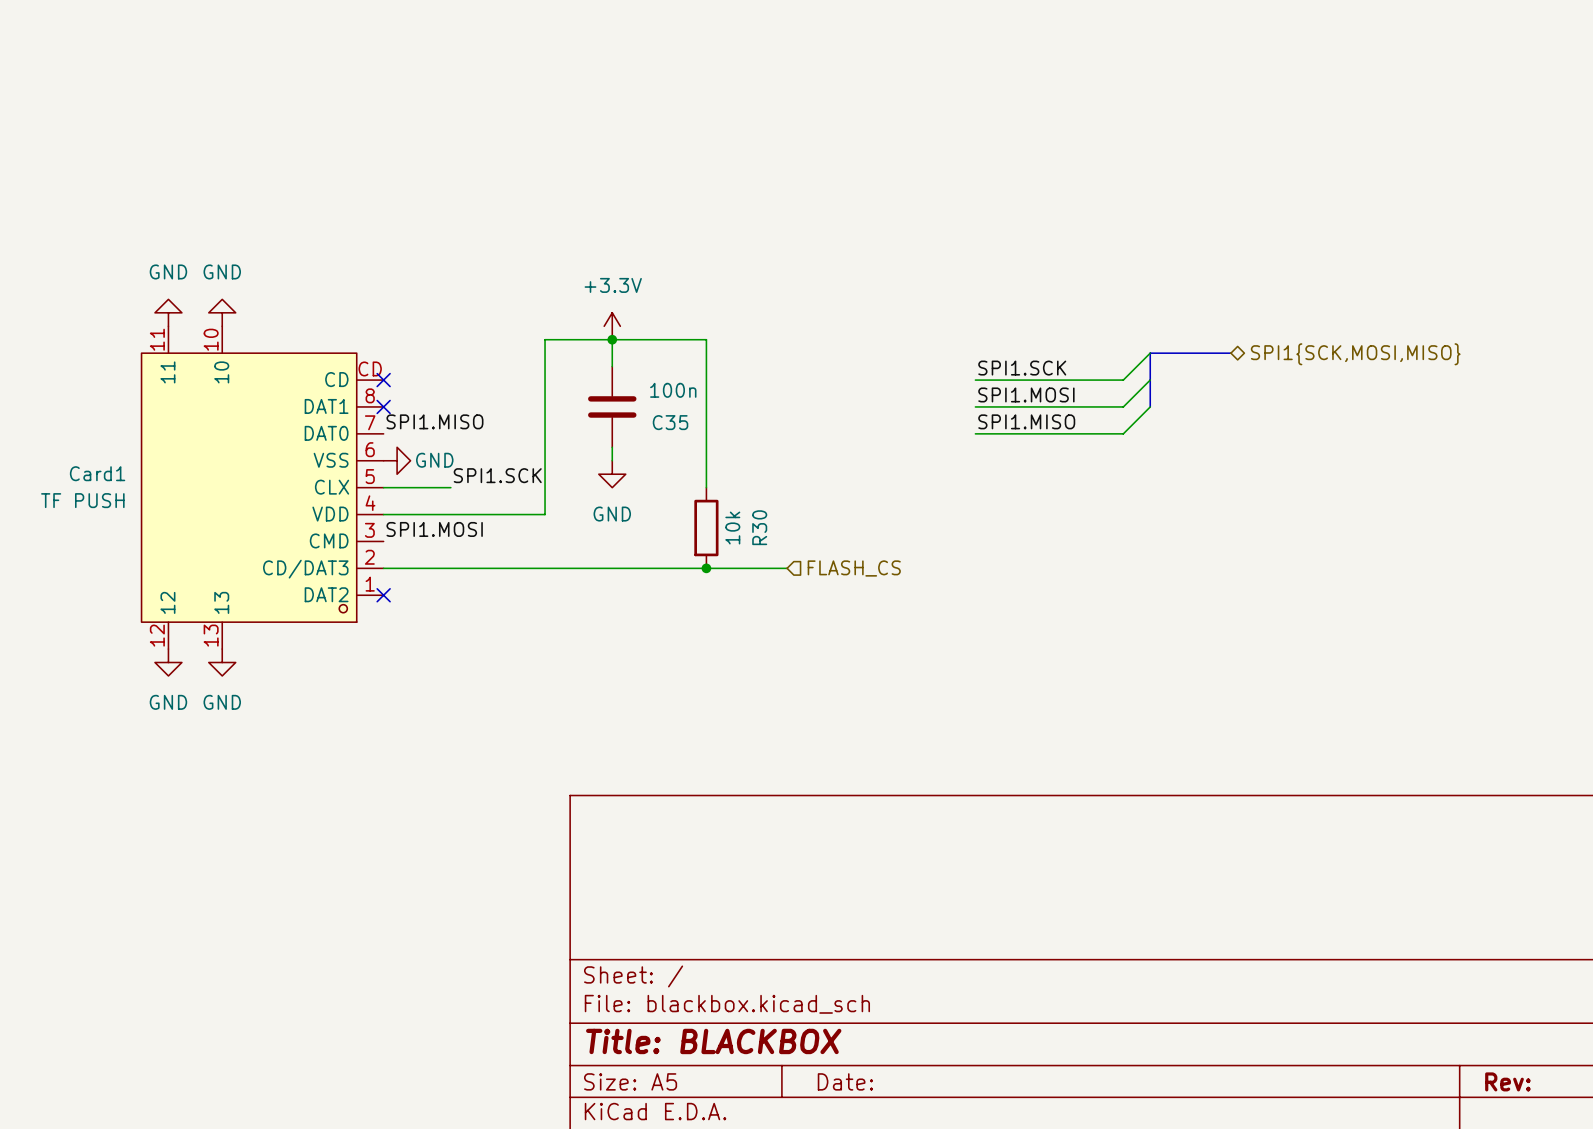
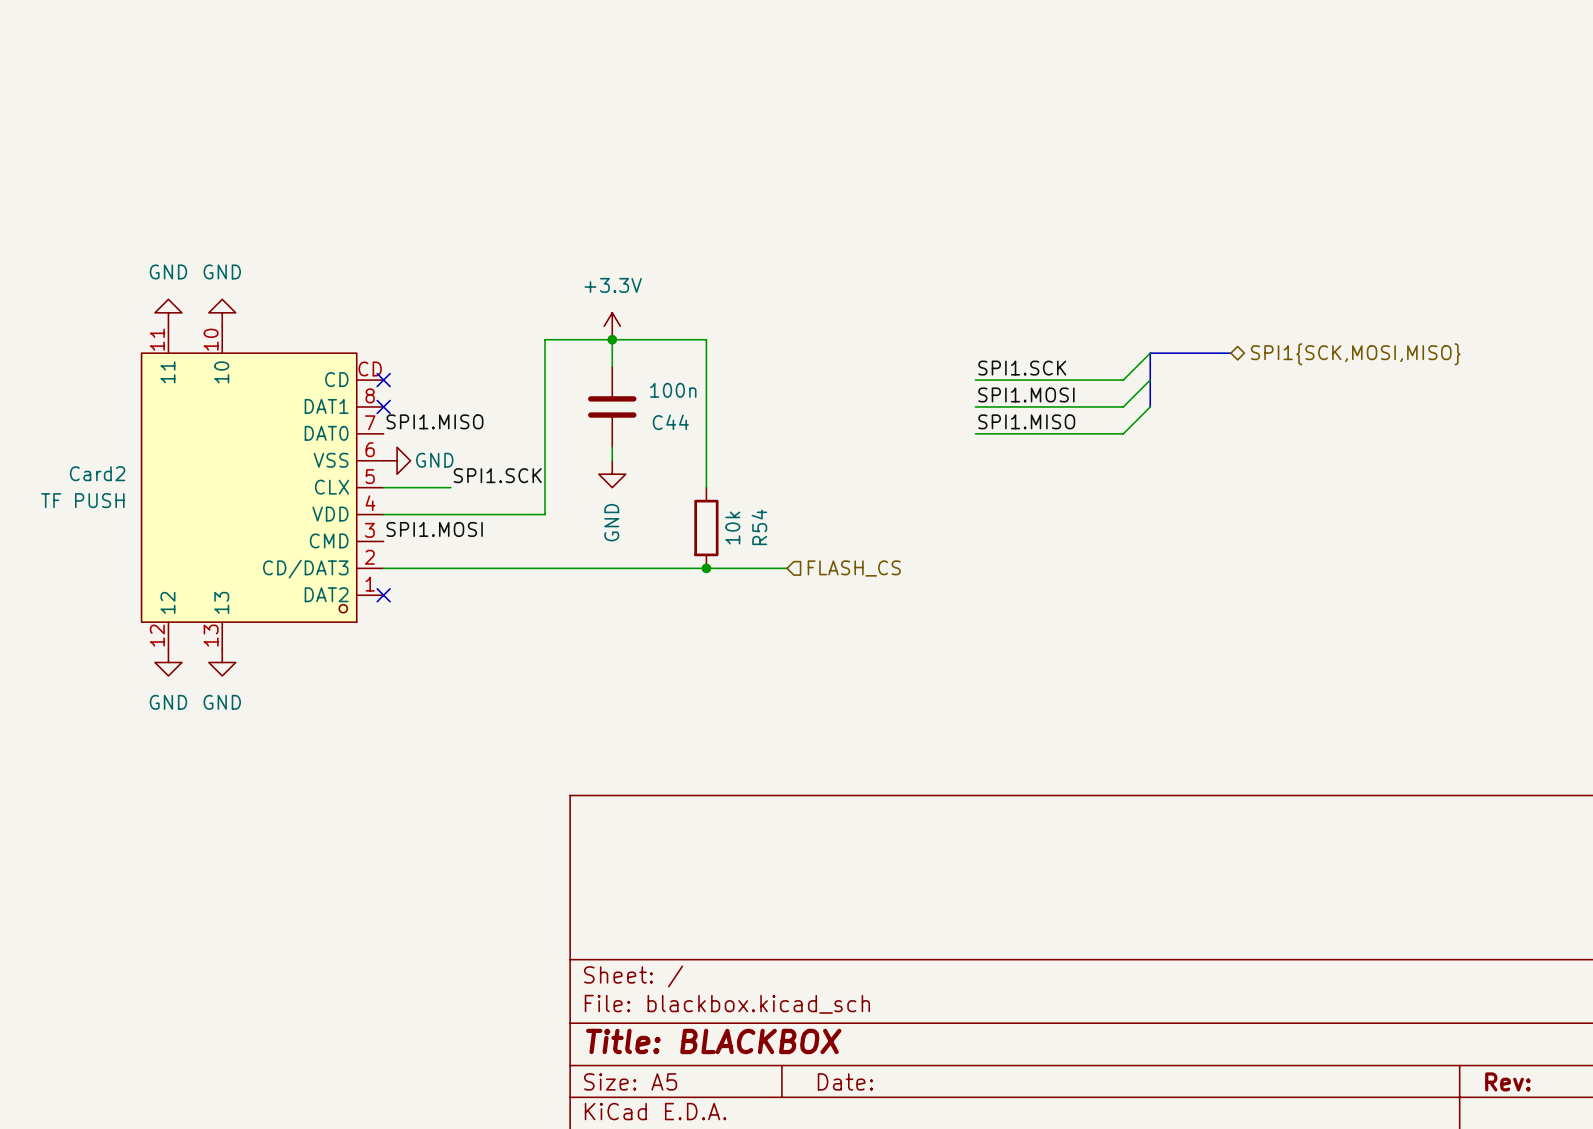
C35 name: C35 (670, 422) -> C44 (670, 422)
Card1 name: Card1 (97, 473) -> Card2 (97, 473)
power symbol text rotation: 0° (612, 514) -> 90° counterclockwise (611, 522)
R30 name: R30 (759, 527) -> R54 (759, 527)

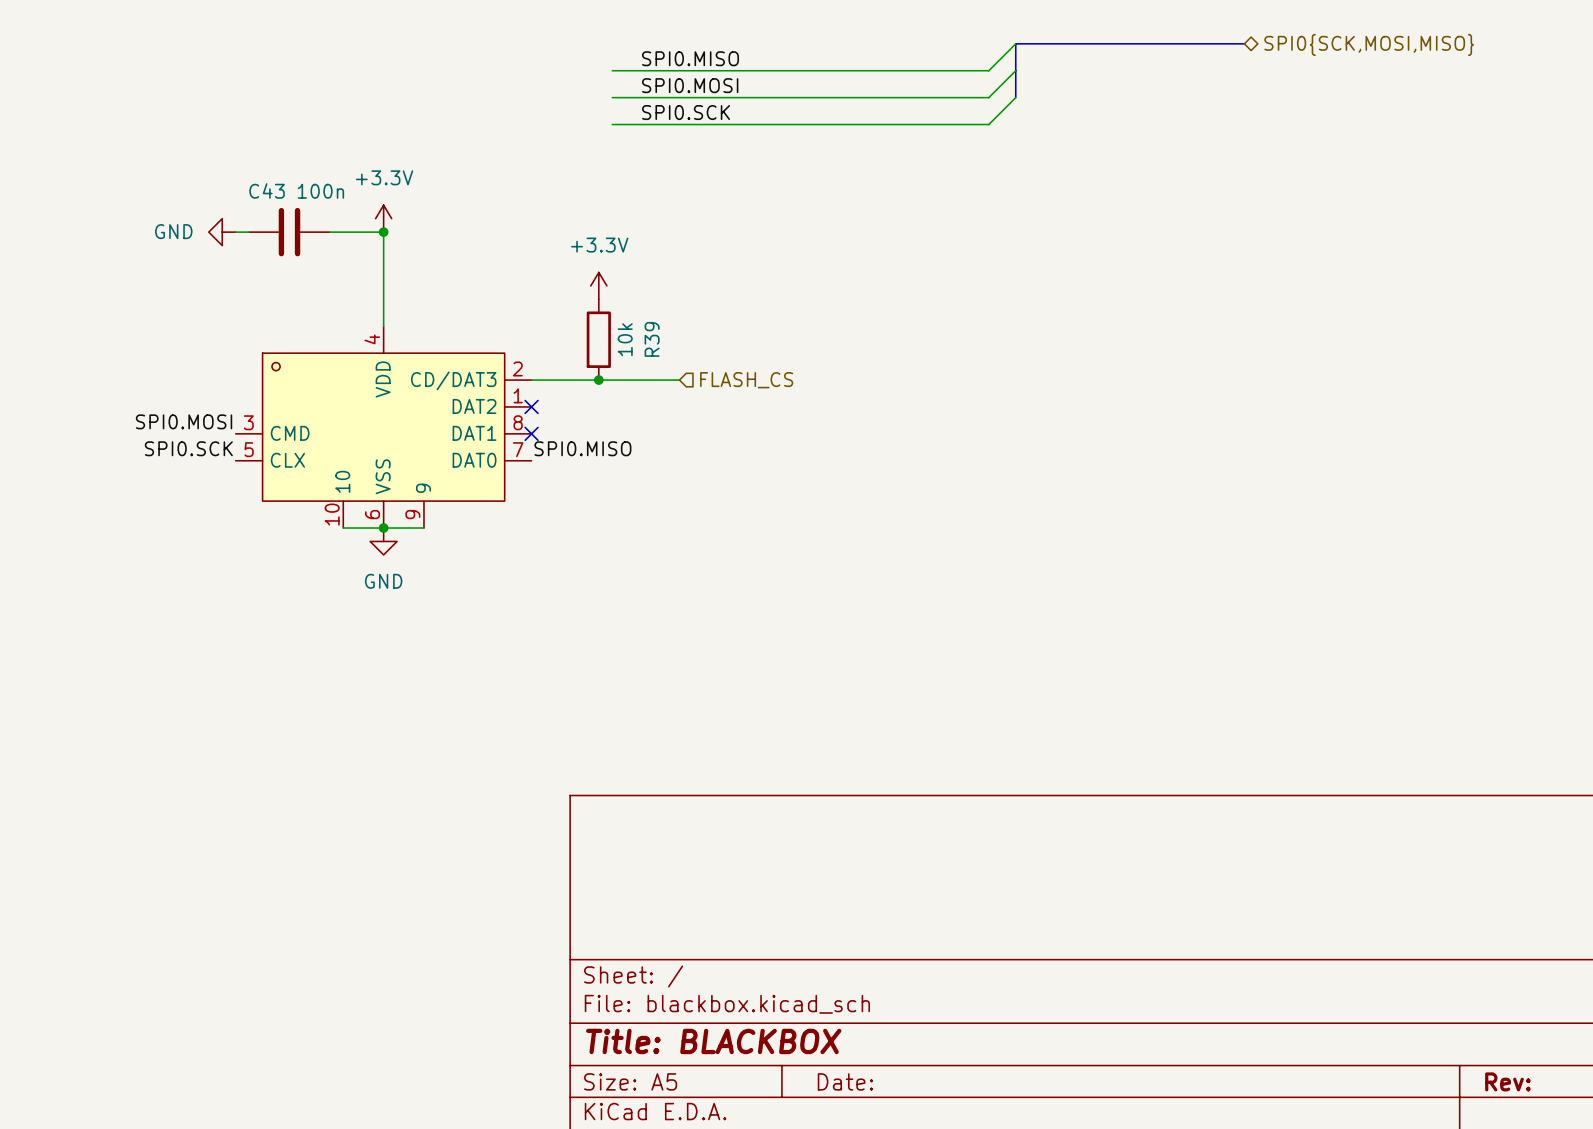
wire: none -> (1015, 43) (988, 70) (612, 70)
bus: none -> (1244, 43) (1015, 43) (1015, 97)
hierarchical label: none -> SPI0{SCK,MOSI,MISO} (1369, 44)
label: none -> SPI0.MISO (690, 58)
wire: none -> (1015, 70) (988, 97) (612, 97)
label: none -> SPI0.MOSI (690, 85)
wire: none -> (1015, 97) (988, 124) (612, 124)
label: none -> SPI0.SCK (686, 112)
power symbol: none -> +3.3V (383, 218)
power symbol: none -> GND (222, 232)
wire: none -> (235, 232) (249, 232)
C43: none -> 100n (289, 232)
wire: none -> (329, 232) (383, 232) (383, 326)
junction: none -> (383, 232)
power symbol: GND (168, 312) -> none
power symbol: GND (222, 312) -> none
power symbol position: +3.3V (612, 326) -> +3.3V (598, 285)
R39: none -> 10k (598, 339)
wire: (612, 339) (612, 366) -> none
junction position: (612, 339) -> (598, 380)
wire: (1150, 353) (1123, 380) (975, 380) -> none
bus: (1230, 353) (1150, 353) (1150, 406) -> none
hierarchical label: SPI1{SCK,MOSI,MISO} (1355, 354) -> none
label: SPI1.SCK (1022, 368) -> none
no-connect mark: (383, 380) -> none
wire: none -> (531, 380) (679, 380)
wire: (1150, 380) (1123, 406) (975, 406) -> none
label: SPI1.MOSI (1026, 394) -> none
no-connect mark: (383, 406) -> none
no-connect mark: none -> (531, 406)
C44: 100n (612, 406) -> none
wire: (1150, 406) (1123, 433) (975, 433) -> none
label: none -> SPI0.MOSI (184, 421)
label: SPI1.MISO (434, 421) -> none
label: SPI1.MISO (1026, 421) -> none
part: none -> (383, 427)
no-connect mark: none -> (531, 433)
wire: (612, 447) (612, 460) -> none
label: none -> SPI0.SCK (188, 448)
label: none -> SPI0.MISO (582, 448)
power symbol rotation: 0° (397, 460) -> 90° clockwise (383, 541)
power symbol position: GND (397, 460) -> GND (383, 541)
power symbol: GND (612, 474) -> none
label: SPI1.SCK (497, 475) -> none
Card2: TF PUSH (262, 487) -> none
wire: (706, 487) (706, 339) (545, 339) (545, 514) (383, 514) -> none
wire: none -> (343, 528) (423, 528)
junction: none -> (383, 528)
R54: 10k (706, 528) -> none
label: SPI1.MOSI (434, 529) -> none
wire: (383, 568) (787, 568) -> none
junction: (706, 568) -> none
hierarchical label position: FLASH_CS (854, 568) -> FLASH_CS (746, 380)
no-connect mark: (383, 595) -> none
power symbol: GND (168, 662) -> none
power symbol: GND (222, 662) -> none

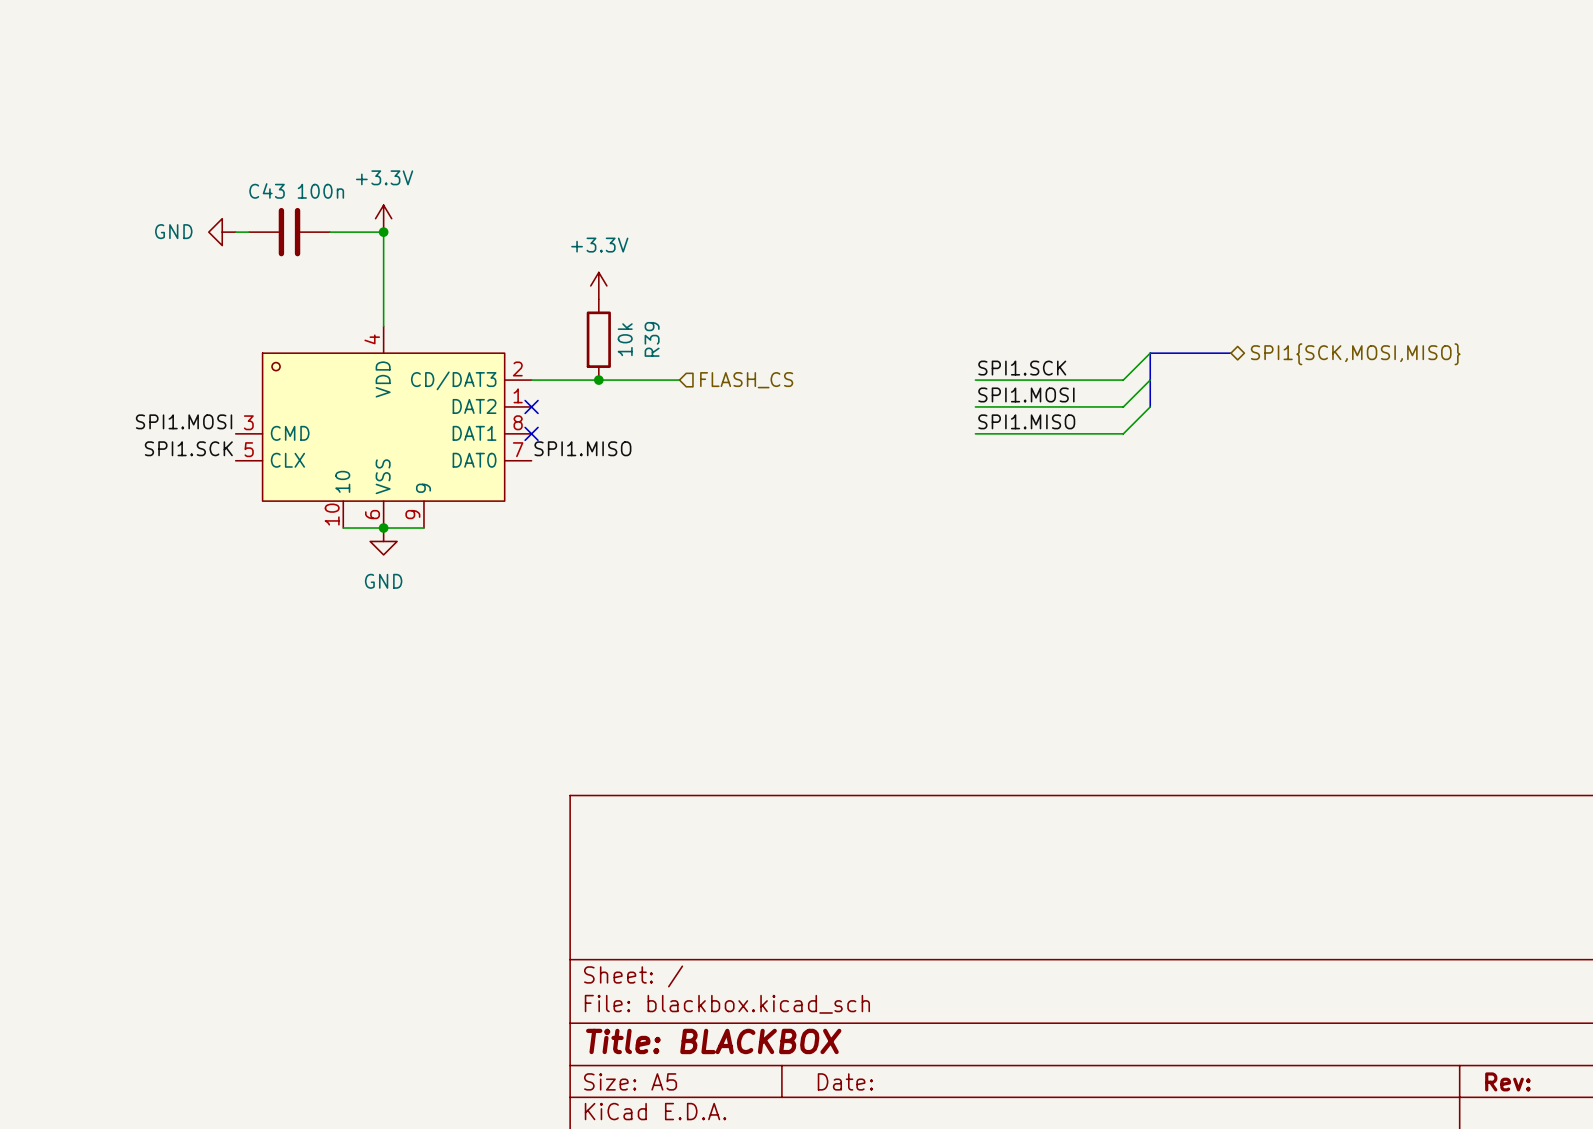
wire: (1015, 43) (988, 70) (612, 70) -> none
bus: (1244, 43) (1015, 43) (1015, 97) -> none
hierarchical label: SPI0{SCK,MOSI,MISO} (1369, 44) -> none
label: SPI0.MISO (690, 58) -> none
wire: (1015, 70) (988, 97) (612, 97) -> none
label: SPI0.MOSI (690, 85) -> none
wire: (1015, 97) (988, 124) (612, 124) -> none
label: SPI0.SCK (686, 112) -> none
wire: none -> (1150, 353) (1123, 380) (975, 380)
bus: none -> (1230, 353) (1150, 353) (1150, 406)
hierarchical label: none -> SPI1{SCK,MOSI,MISO} (1355, 354)
label: none -> SPI1.SCK (1022, 368)
wire: none -> (1150, 380) (1123, 406) (975, 406)
label: none -> SPI1.MOSI (1026, 394)
wire: none -> (1150, 406) (1123, 433) (975, 433)
label: SPI0.MOSI (184, 421) -> SPI1.MOSI (184, 421)
label: none -> SPI1.MISO (1026, 421)
label: SPI0.SCK (188, 448) -> SPI1.SCK (188, 448)
label: SPI0.MISO (582, 448) -> SPI1.MISO (582, 448)

